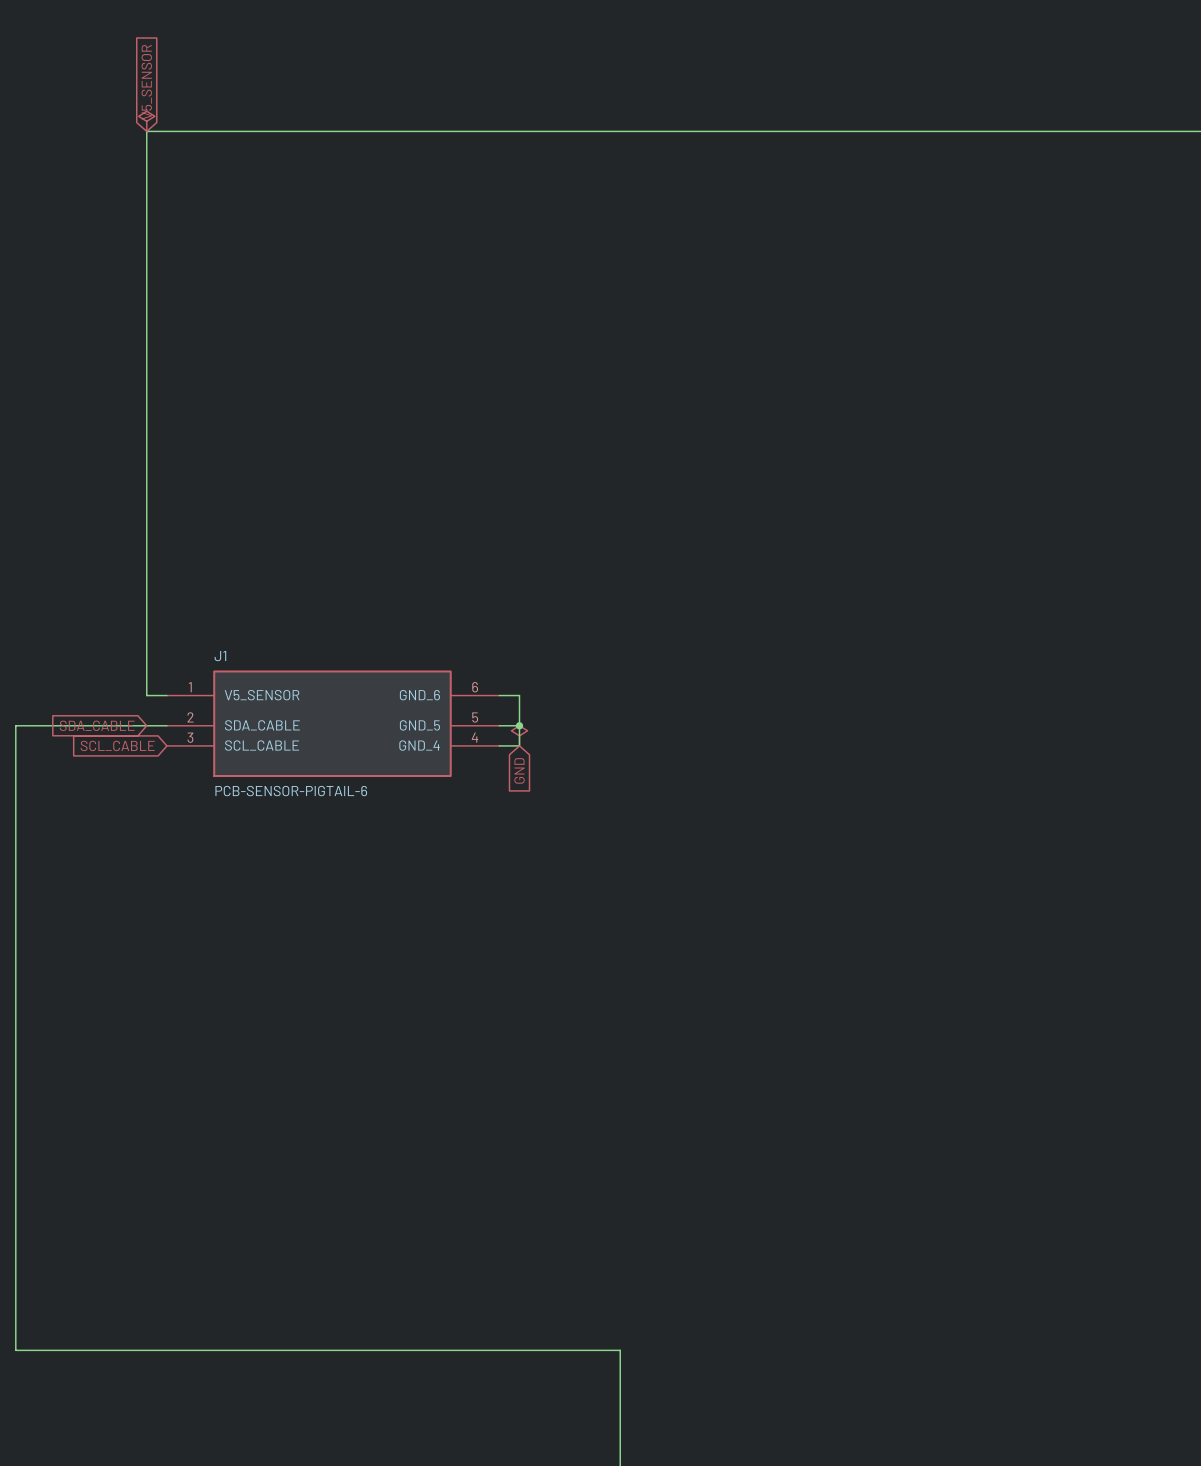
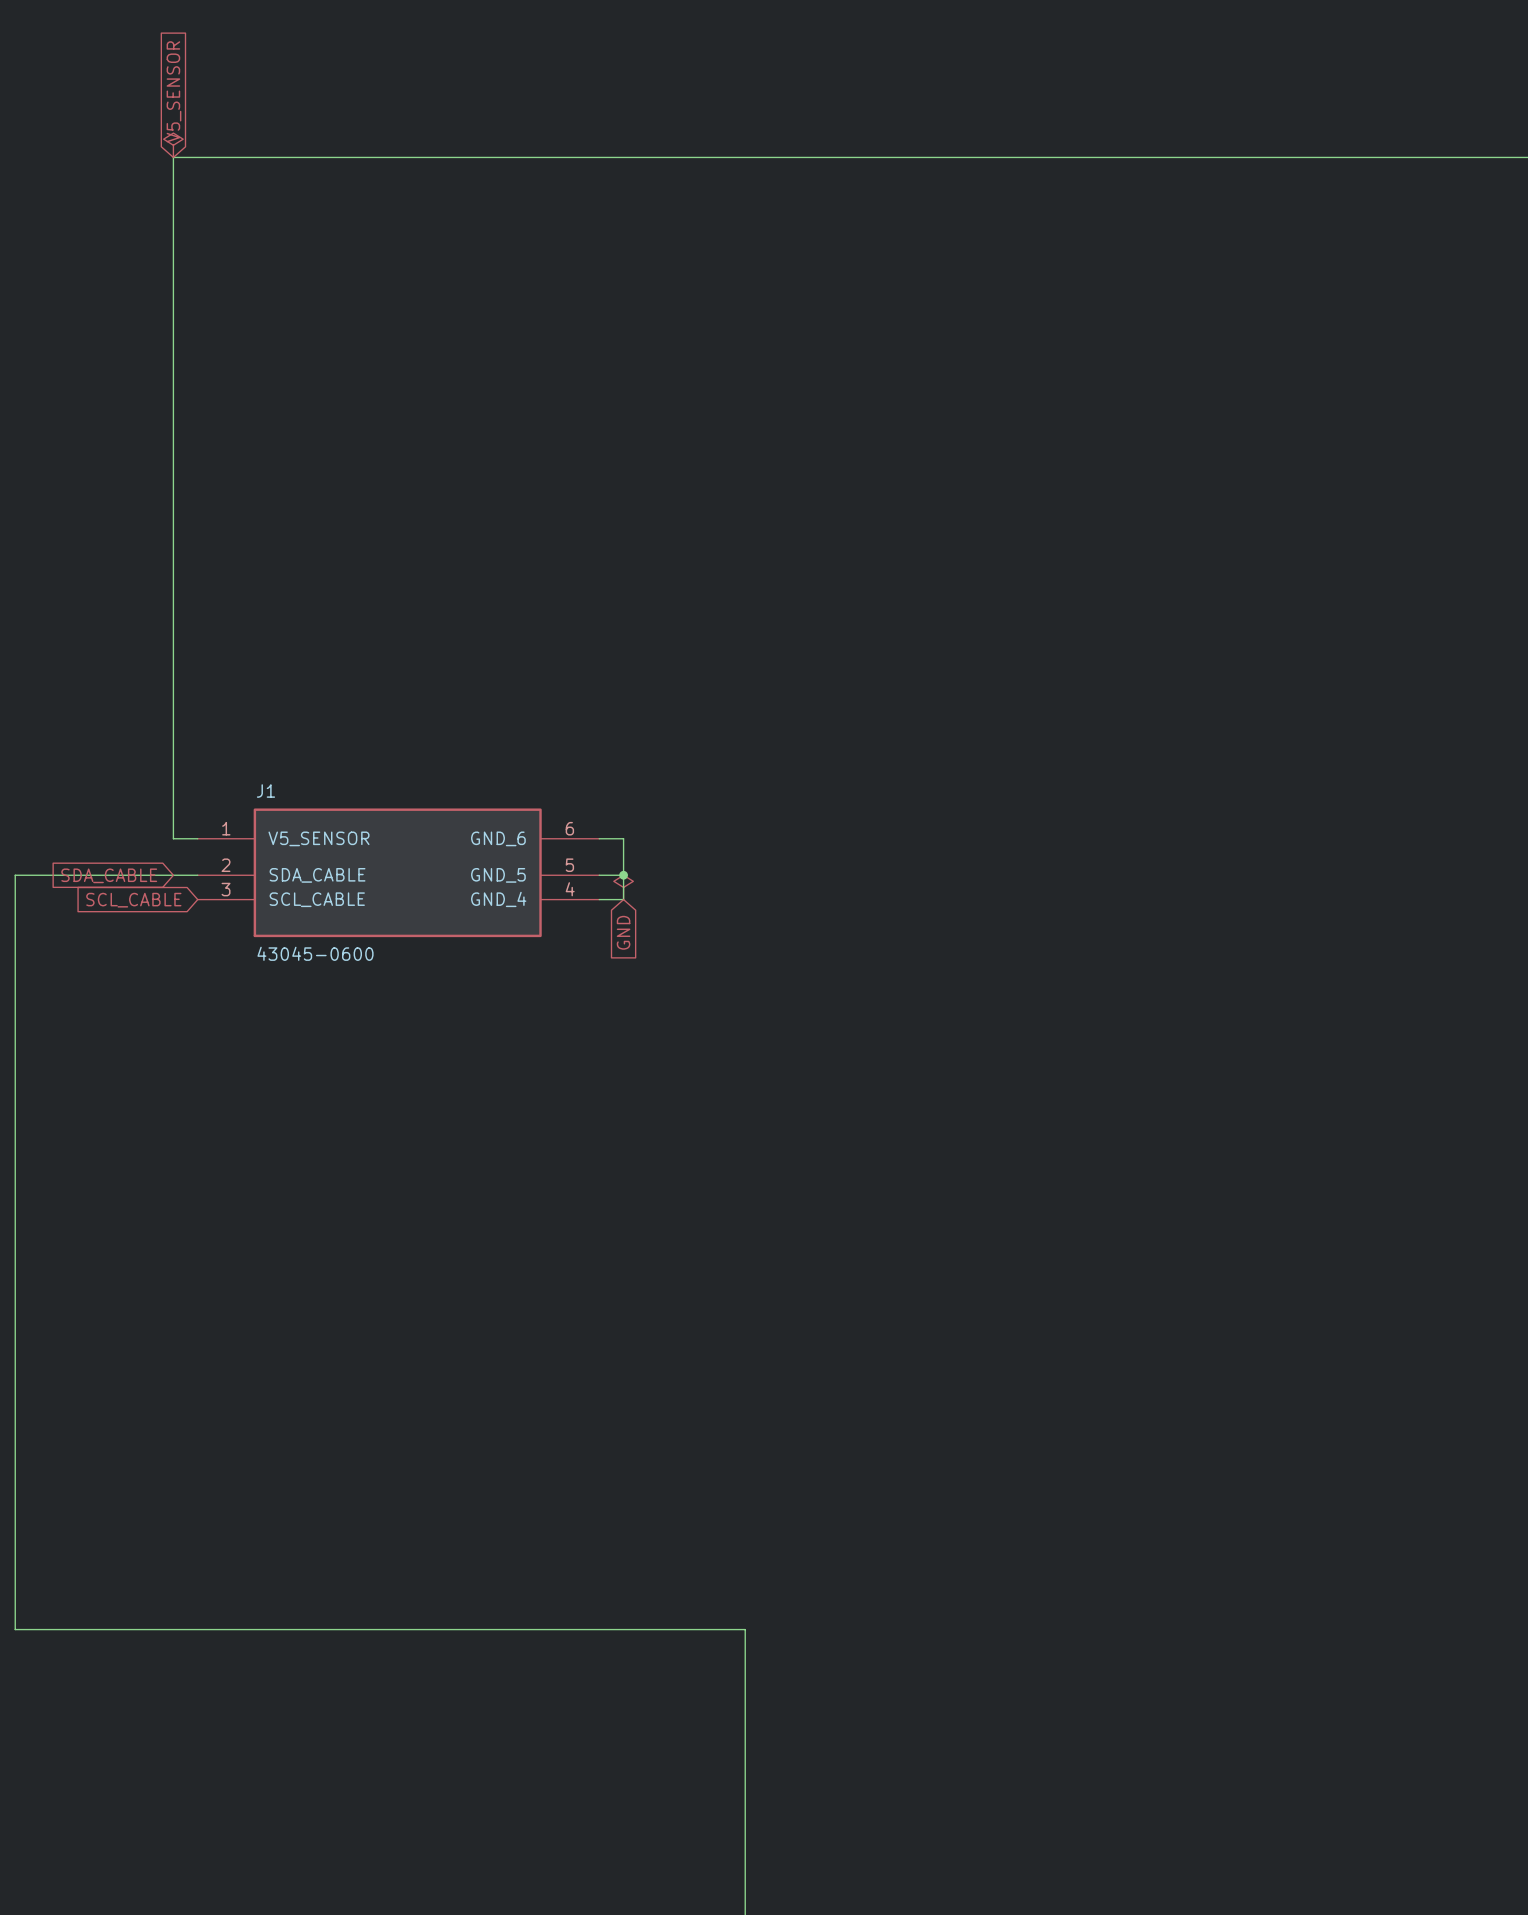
J1 value: PCB-SENSOR-PIGTAIL-6 (291, 791) -> 43045-0600 (315, 953)

